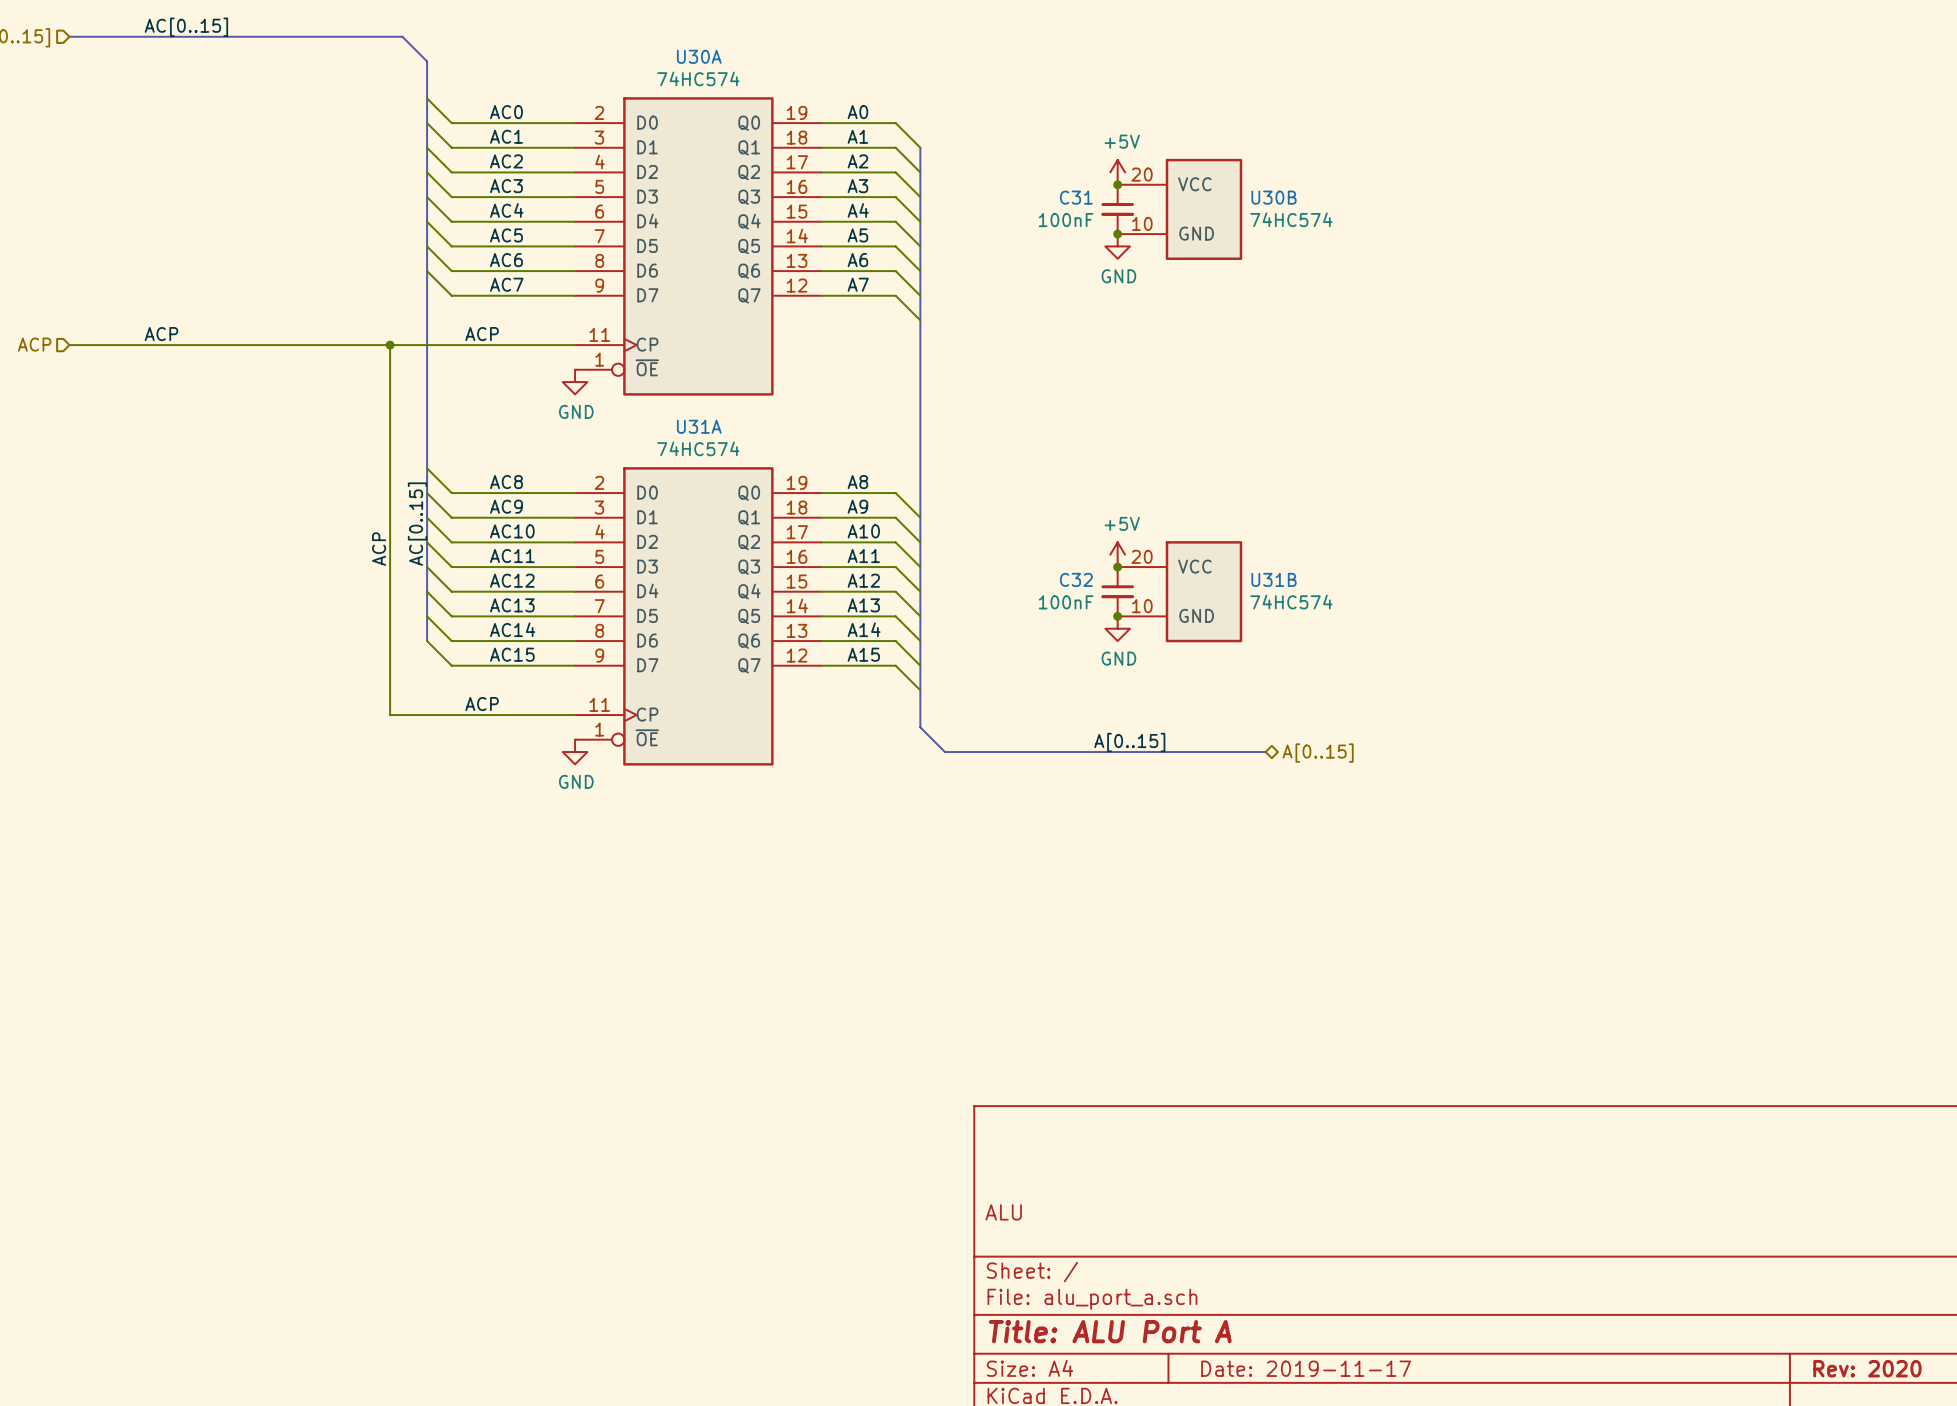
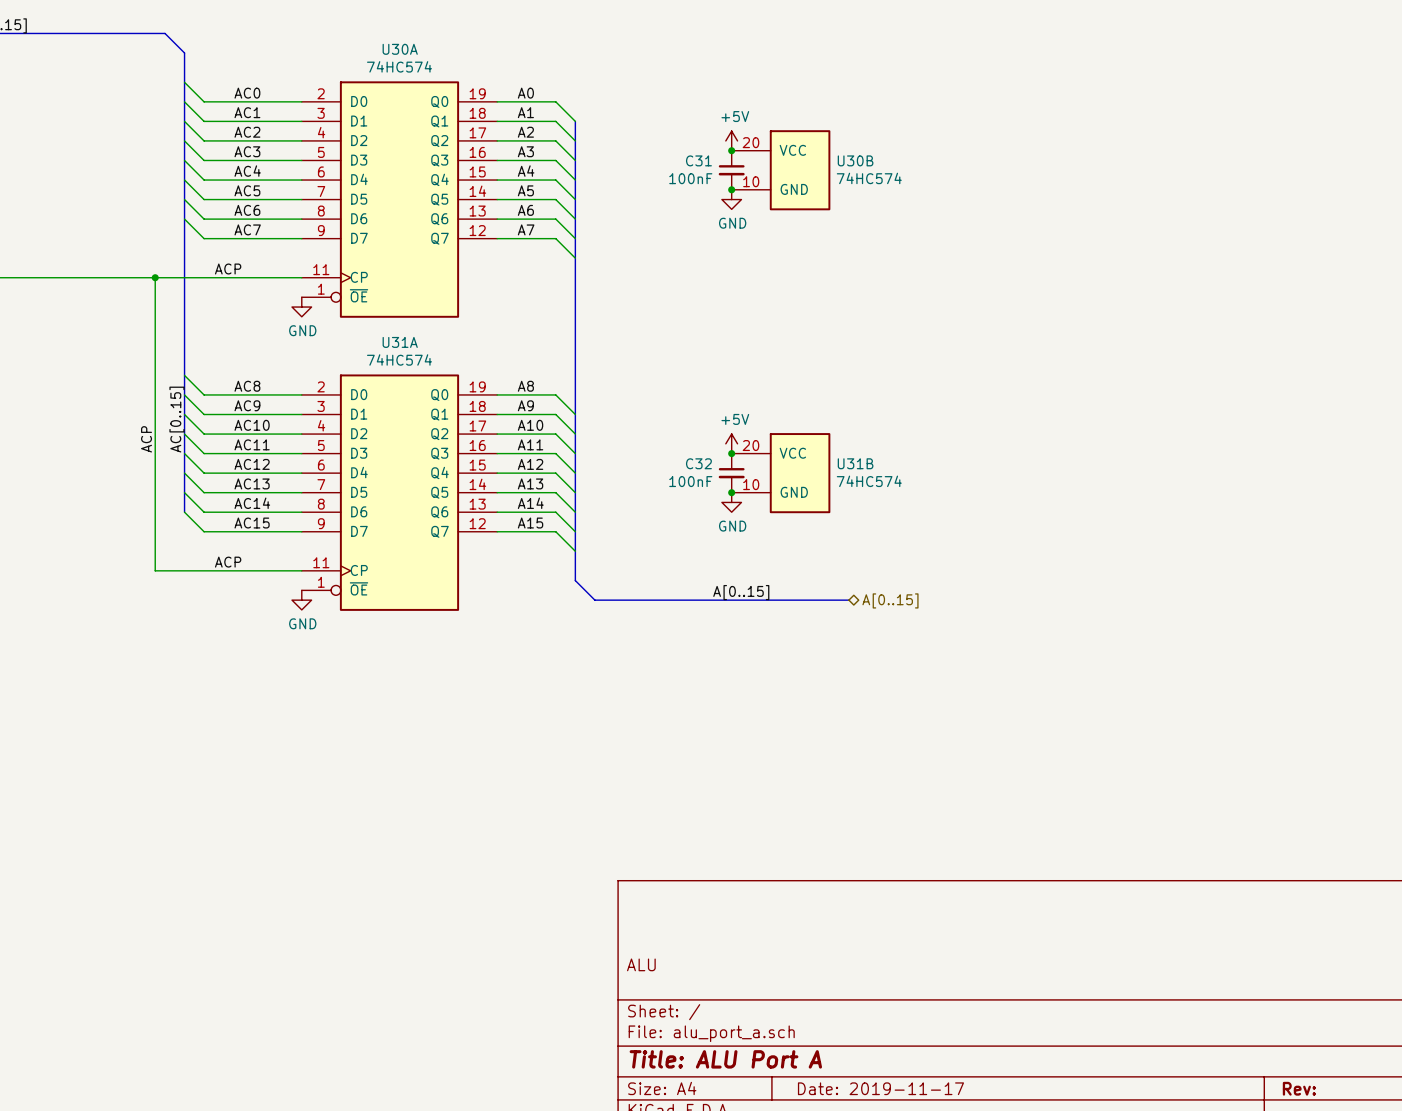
title block: Rev: 2020 (1867, 1368) -> Rev: (1299, 1088)

